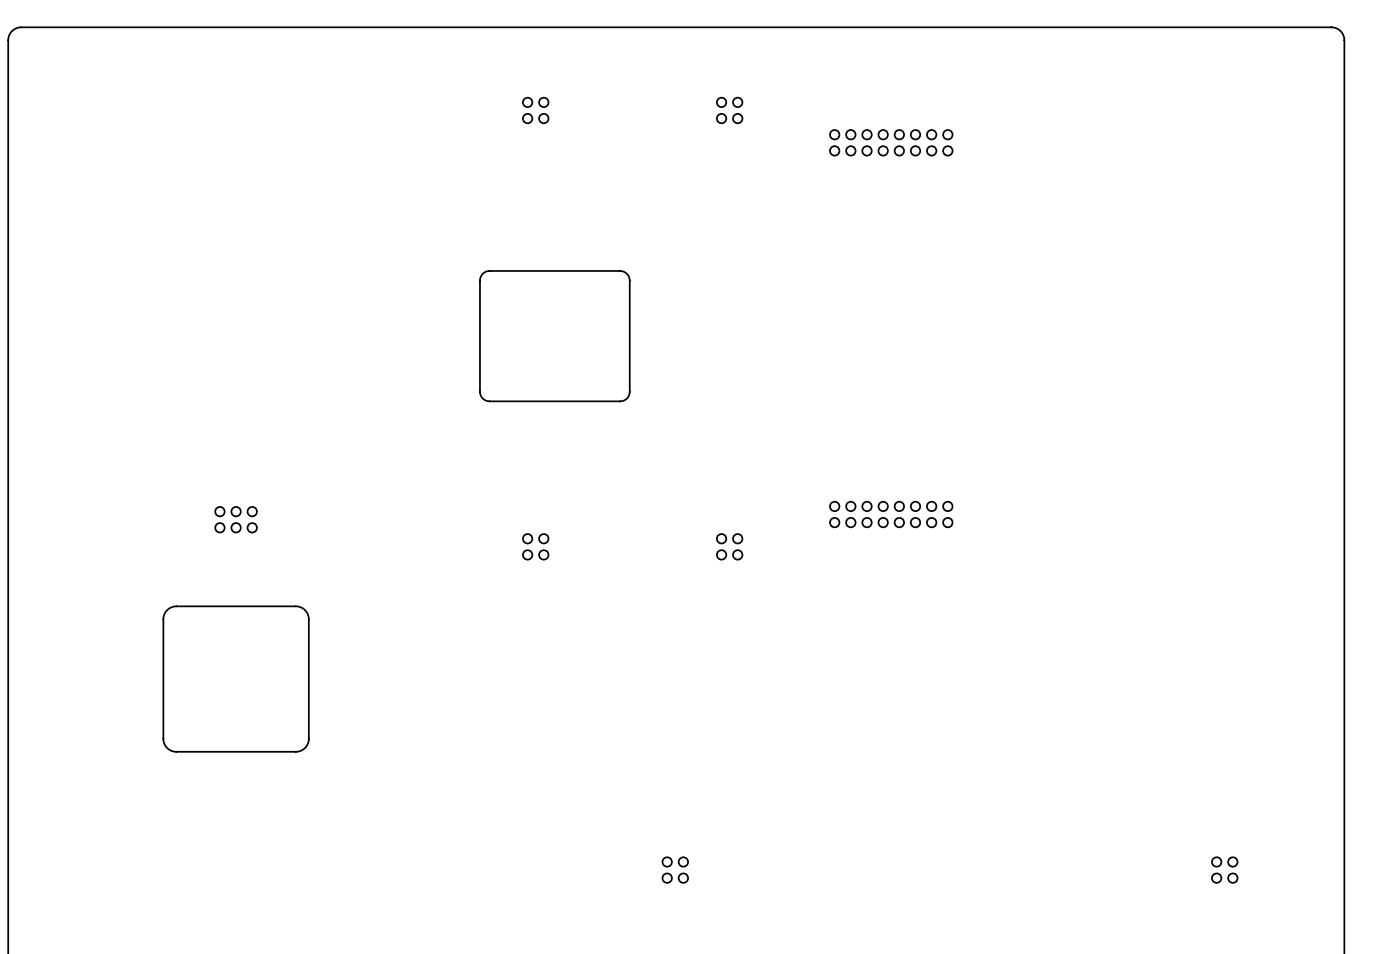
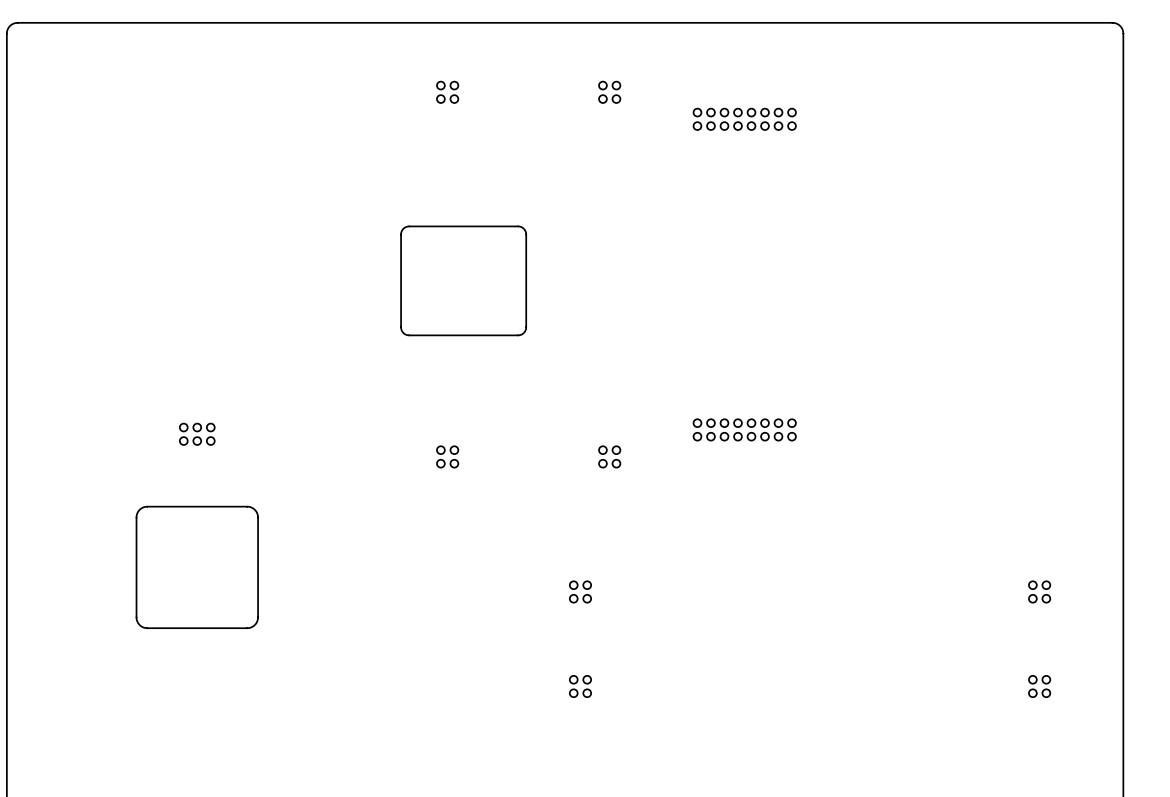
part: none -> (580, 591)
part: none -> (1039, 591)
part position: (675, 870) -> (580, 686)
part position: (1224, 870) -> (1039, 686)

